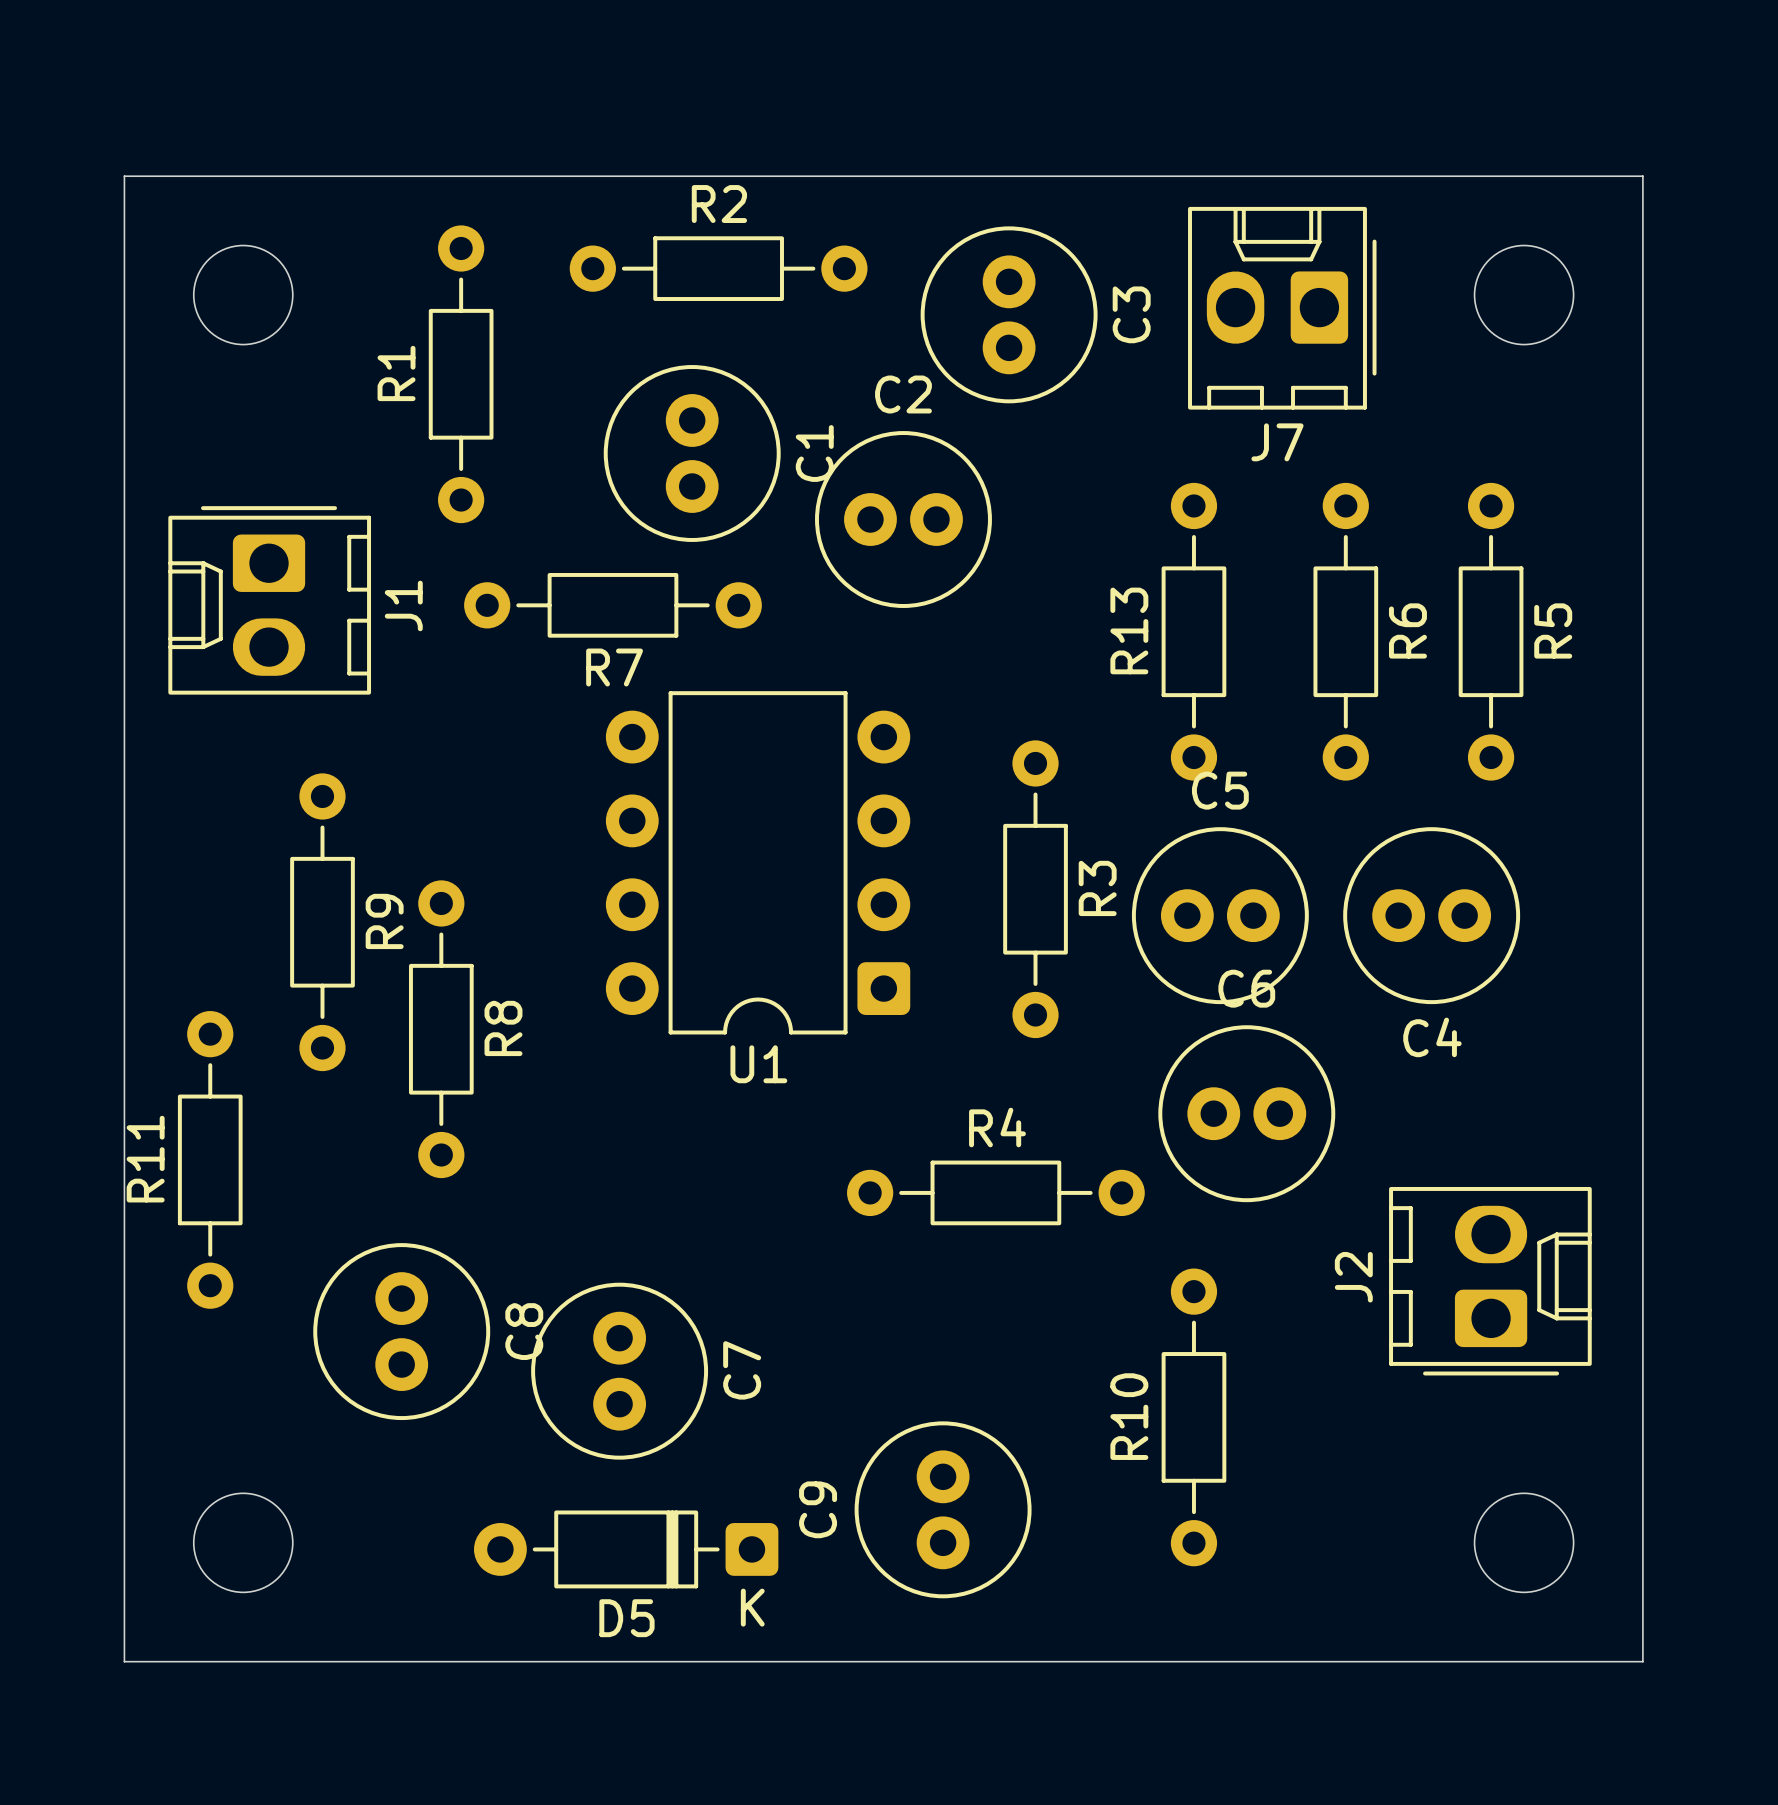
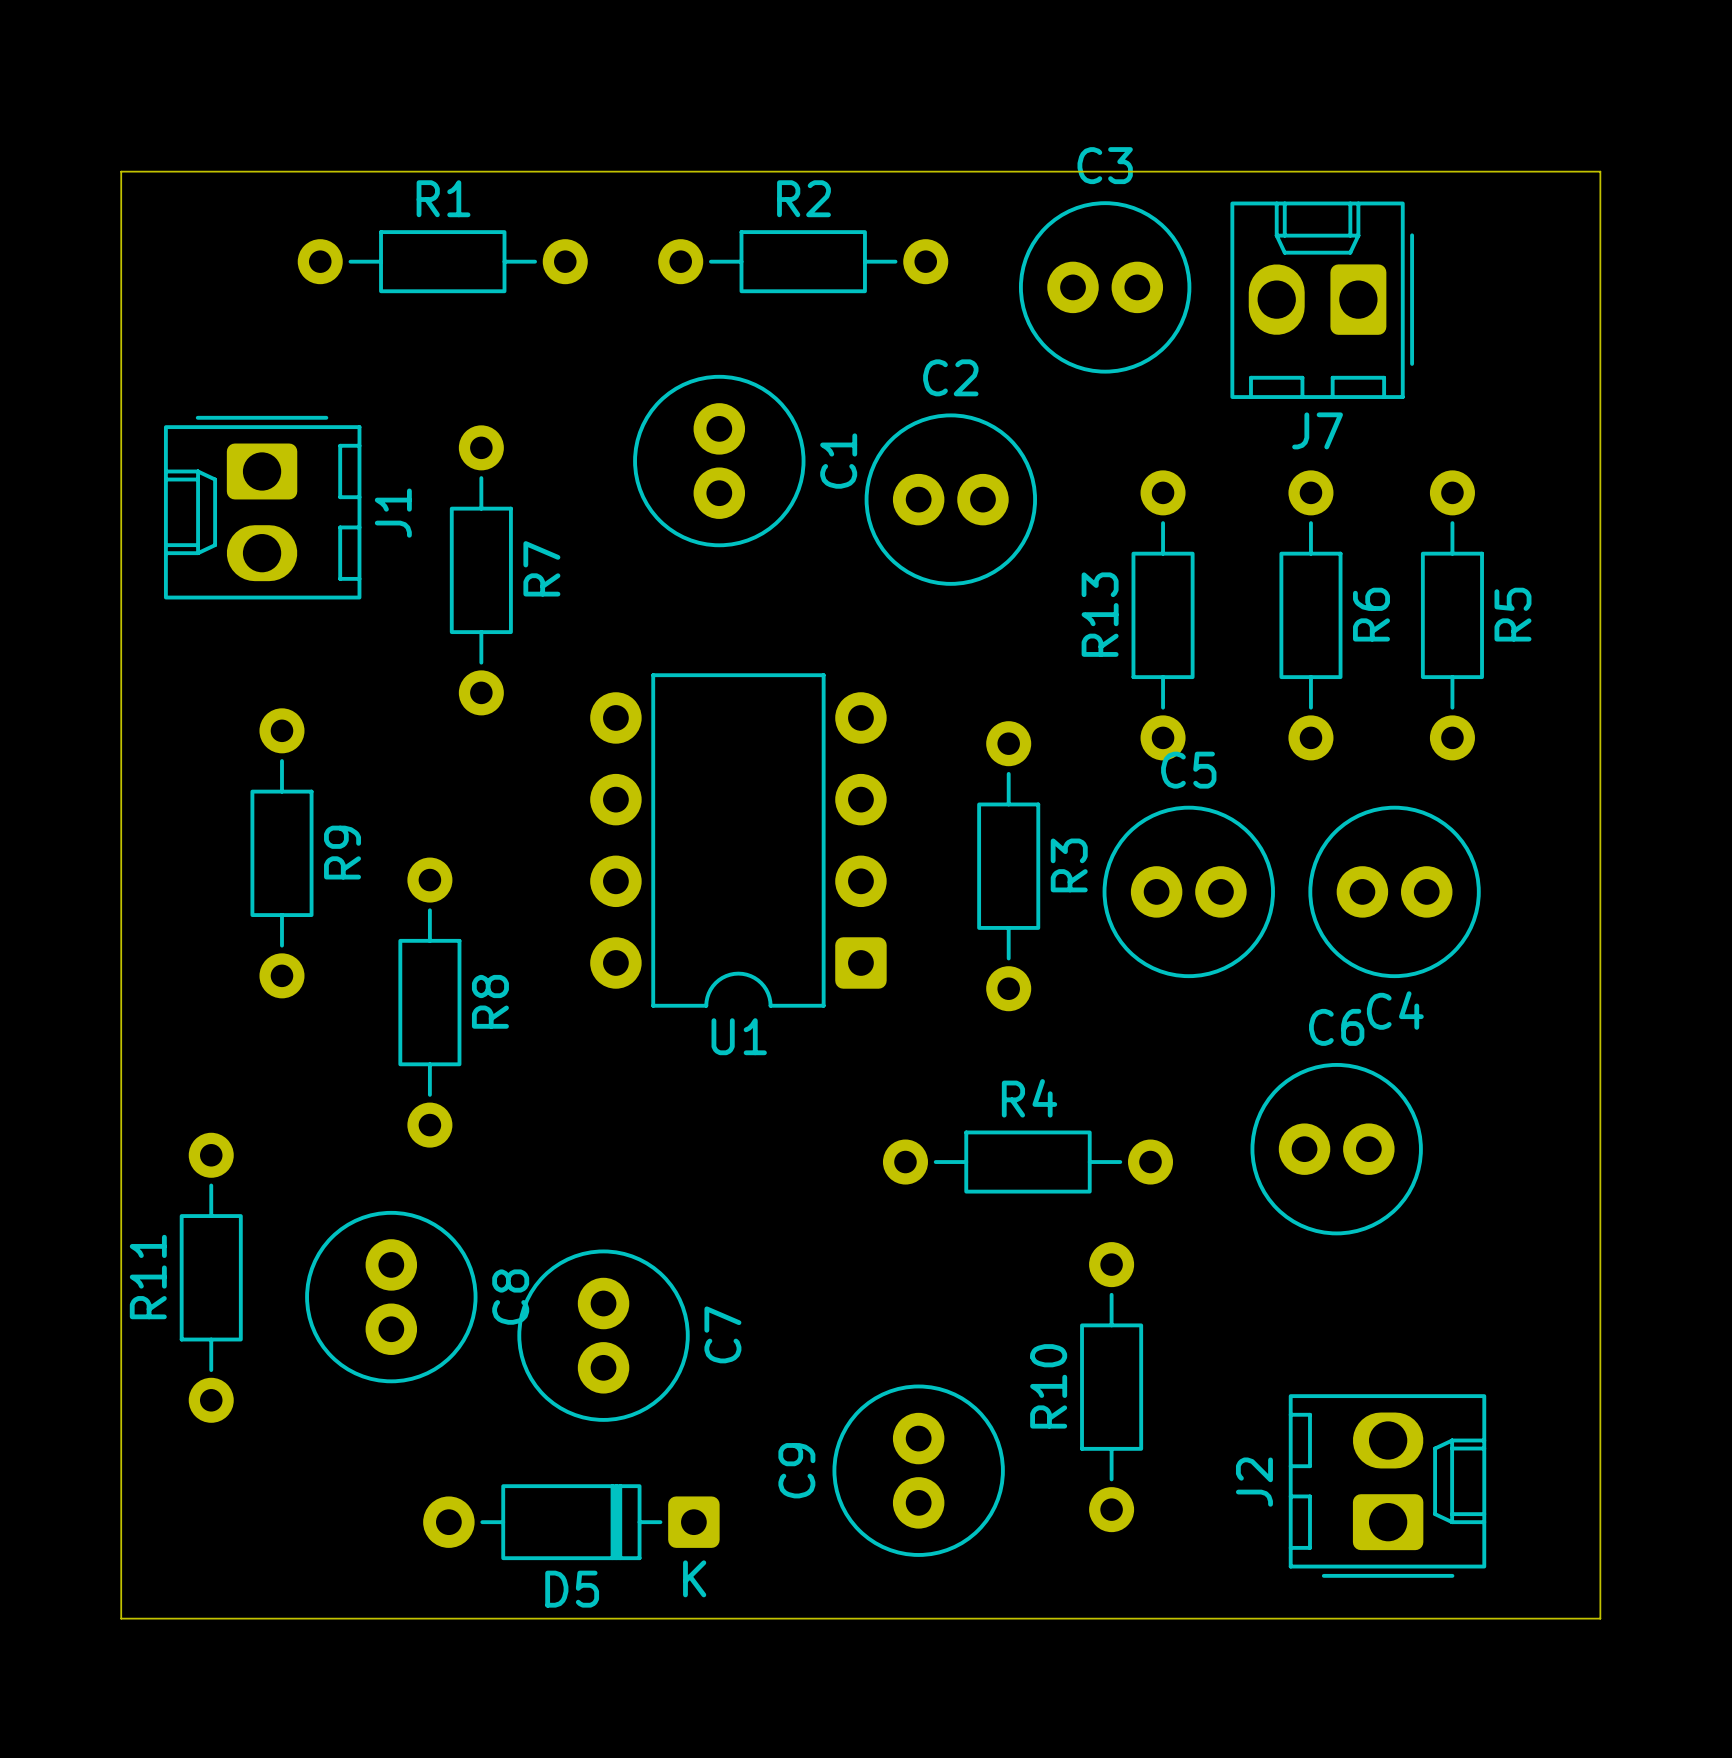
round board edge: [192, 244, 294, 346] -> none
round board edge: [1473, 244, 1575, 346] -> none
R2 position: (718, 268) -> (803, 261)
J7 position: (1282, 308) -> (1322, 300)
C3 rotation: 0° (1009, 314) -> 90° clockwise (1105, 287)
C3 position: (1009, 314) -> (1105, 287)
C3 name position: C3 (1131, 314) -> C3 (1105, 165)
R1 rotation: 0° (461, 374) -> 90° clockwise (442, 261)
C1 position: (692, 453) -> (719, 461)
C2 position: (903, 519) -> (950, 499)
J1 position: (269, 600) -> (262, 507)
R7 rotation: 0° (612, 605) -> 90° clockwise (481, 570)
R7 name position: R7 (614, 667) -> R7 (541, 568)
R9 position: (322, 922) -> (281, 853)
C6 position: (1246, 1113) -> (1336, 1149)
R11 position: (210, 1159) -> (211, 1277)
R4 position: (995, 1192) -> (1027, 1162)
J2 position: (1490, 1281) -> (1387, 1485)
R10 position: (1193, 1417) -> (1111, 1387)
round board edge: [192, 1492, 294, 1594] -> none
round board edge: [1473, 1492, 1575, 1594] -> none
D5 position: (626, 1549) -> (571, 1522)

